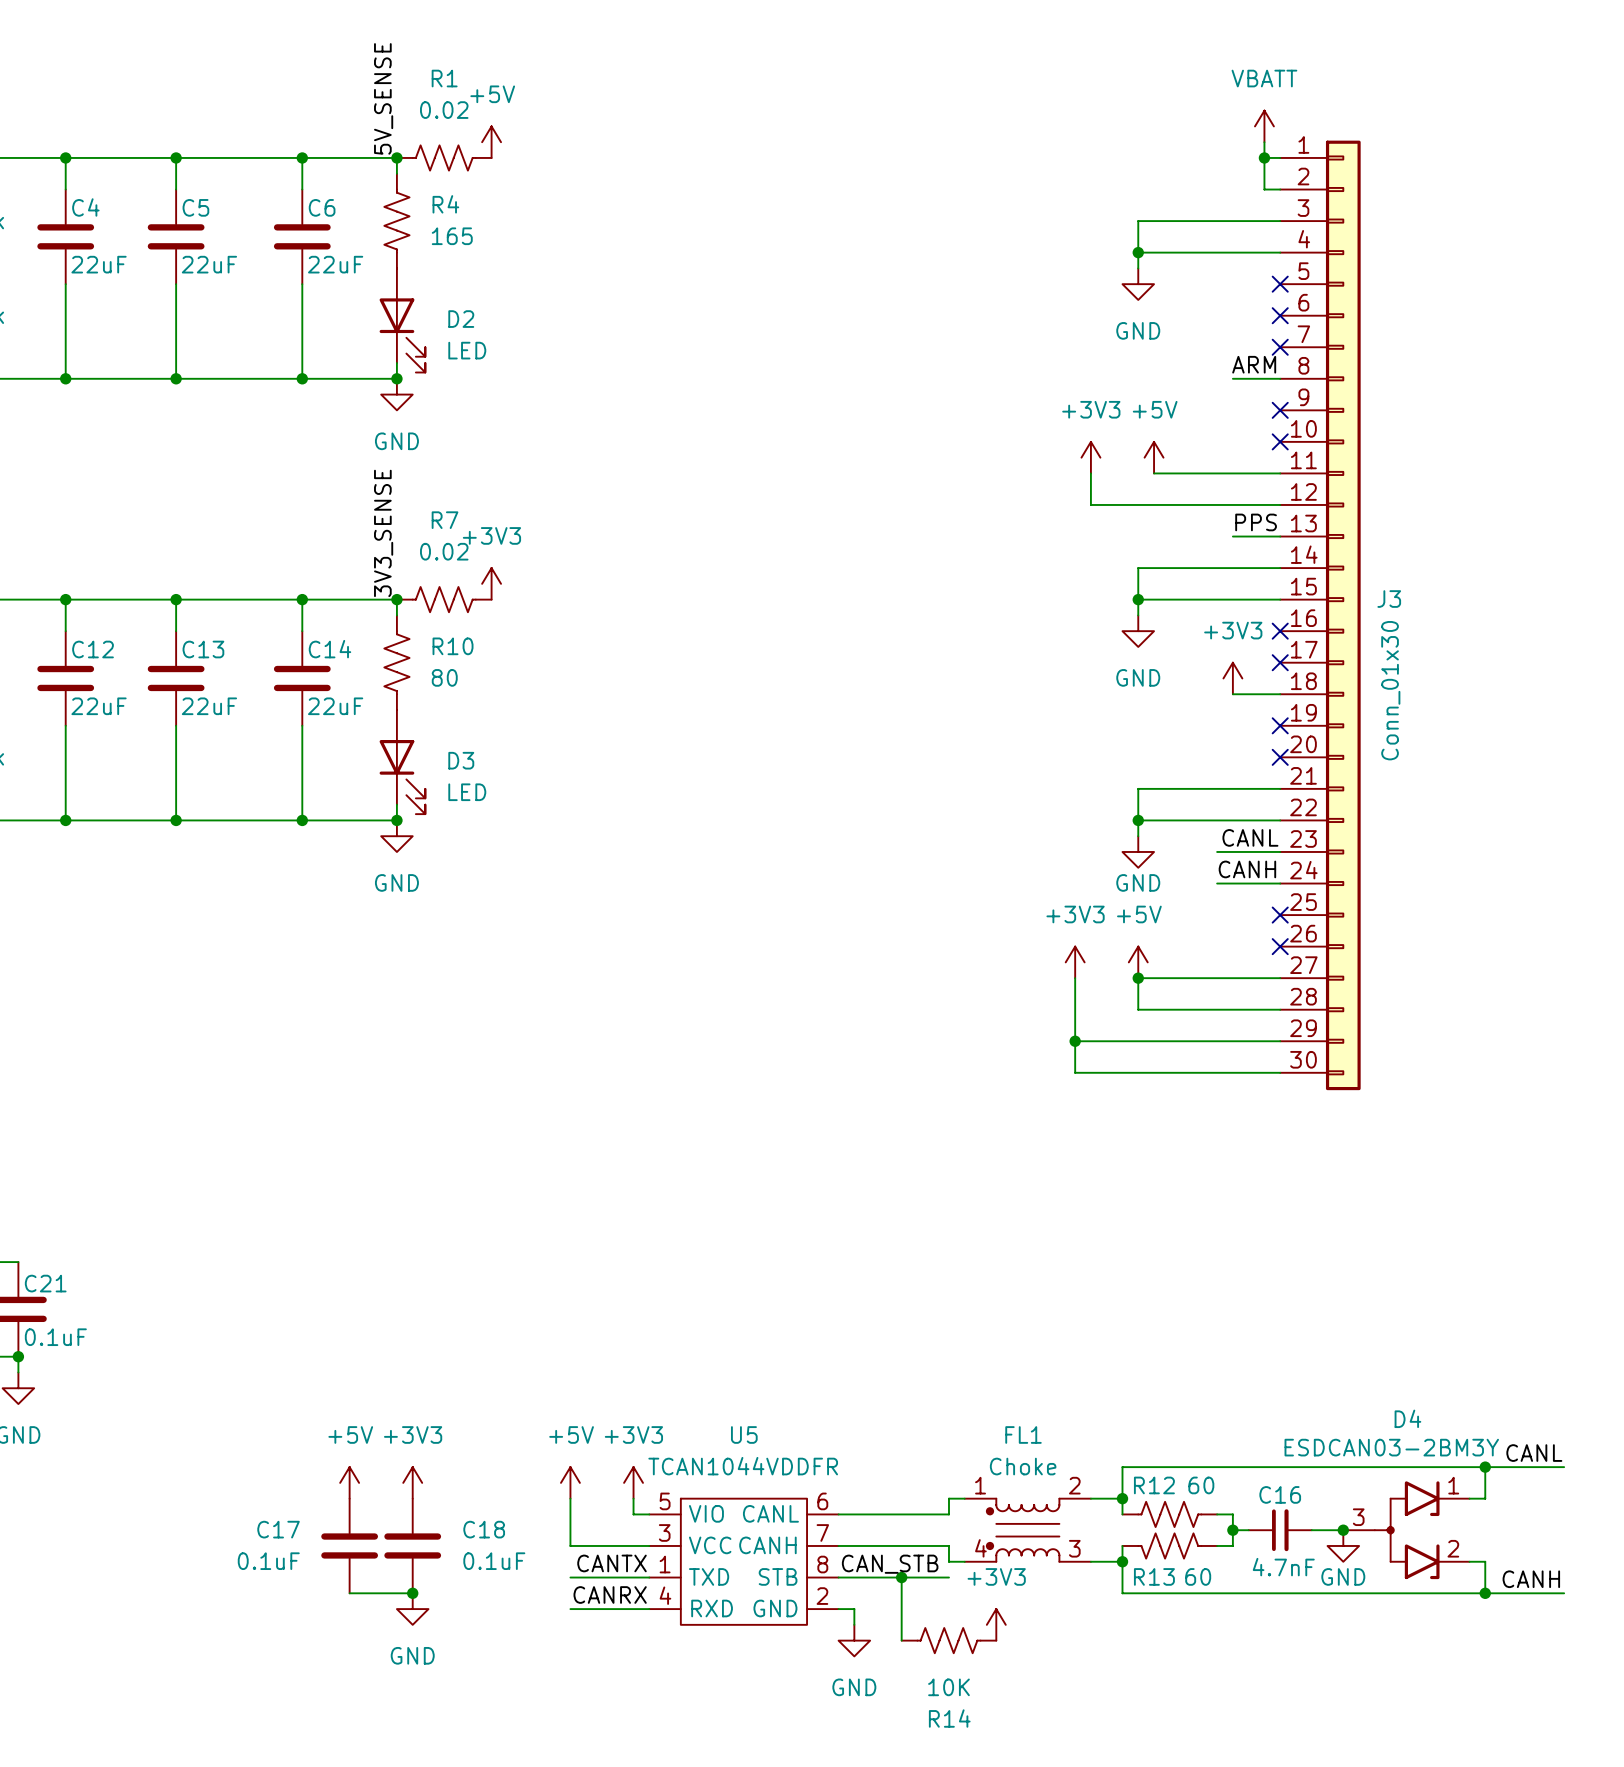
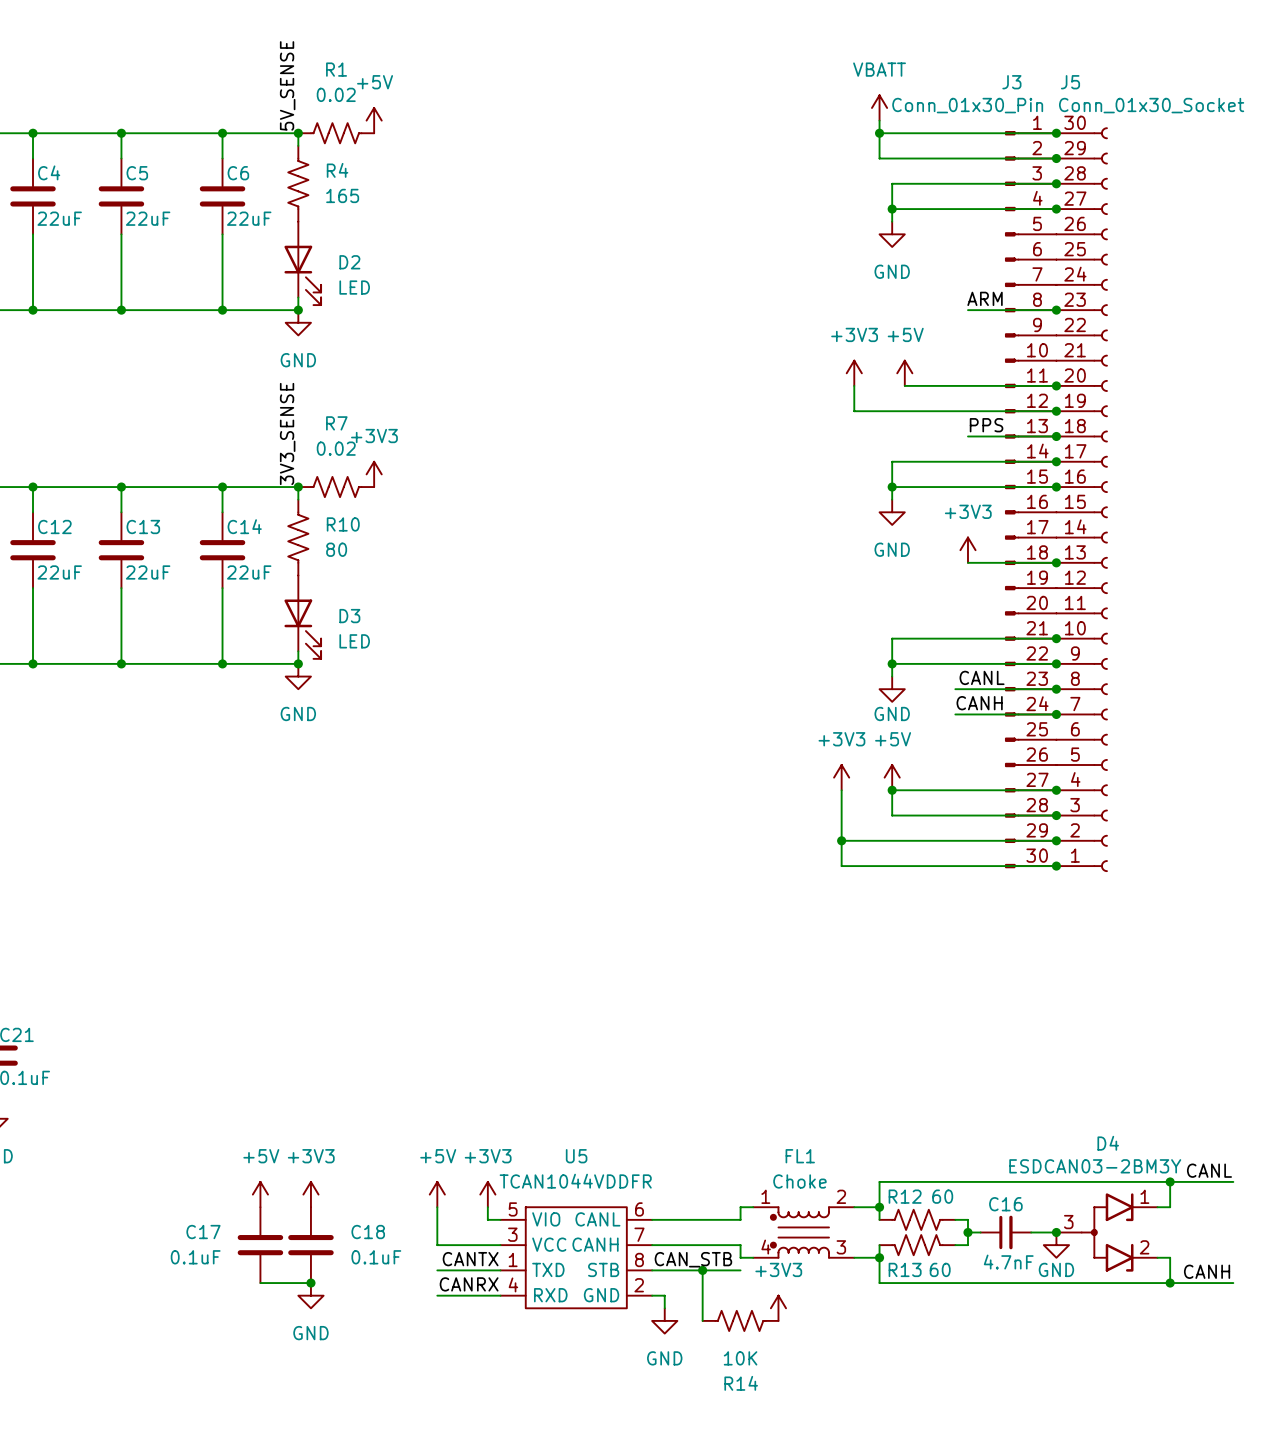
power symbol position: VBATT (1264, 126) -> VBATT (879, 107)
J3 symbol: [1280, 140, 1361, 1091] -> [1005, 131, 1057, 869]
wire: (1264, 142) (1264, 189) -> (879, 120) (879, 158) (993, 158)
wire: none -> (879, 133) (993, 133)
junction: none -> (879, 133)
junction: (1264, 157) -> none
junction: none -> (1056, 133)
junction: none -> (1056, 158)
junction: none -> (1056, 183)
junction: none -> (1056, 209)
no-connect mark: (1280, 284) -> none
no-connect mark: (1280, 315) -> none
no-connect mark: (1280, 347) -> none
junction: none -> (1056, 310)
no-connect mark: (1280, 410) -> none
no-connect mark: (1280, 441) -> none
junction: none -> (1056, 385)
junction: none -> (1056, 411)
junction: none -> (1056, 436)
junction: none -> (1056, 461)
junction: none -> (1056, 487)
J3 name position: J3 (1389, 599) -> J3 (1011, 82)
J5: none -> Conn_01x30_Socket (1082, 499)
no-connect mark: (1280, 631) -> none
no-connect mark: (1280, 662) -> none
J3 value: Conn_01x30 (1390, 690) -> Conn_01x30_Pin (967, 105)
junction: none -> (1056, 562)
no-connect mark: (1280, 725) -> none
no-connect mark: (1280, 757) -> none
junction: none -> (1056, 638)
junction: none -> (1056, 663)
junction: none -> (1056, 689)
junction: none -> (1056, 714)
no-connect mark: (1280, 915) -> none
no-connect mark: (1280, 946) -> none
junction: none -> (1056, 790)
junction: none -> (1056, 815)
junction: none -> (1056, 840)
junction: none -> (1056, 866)

